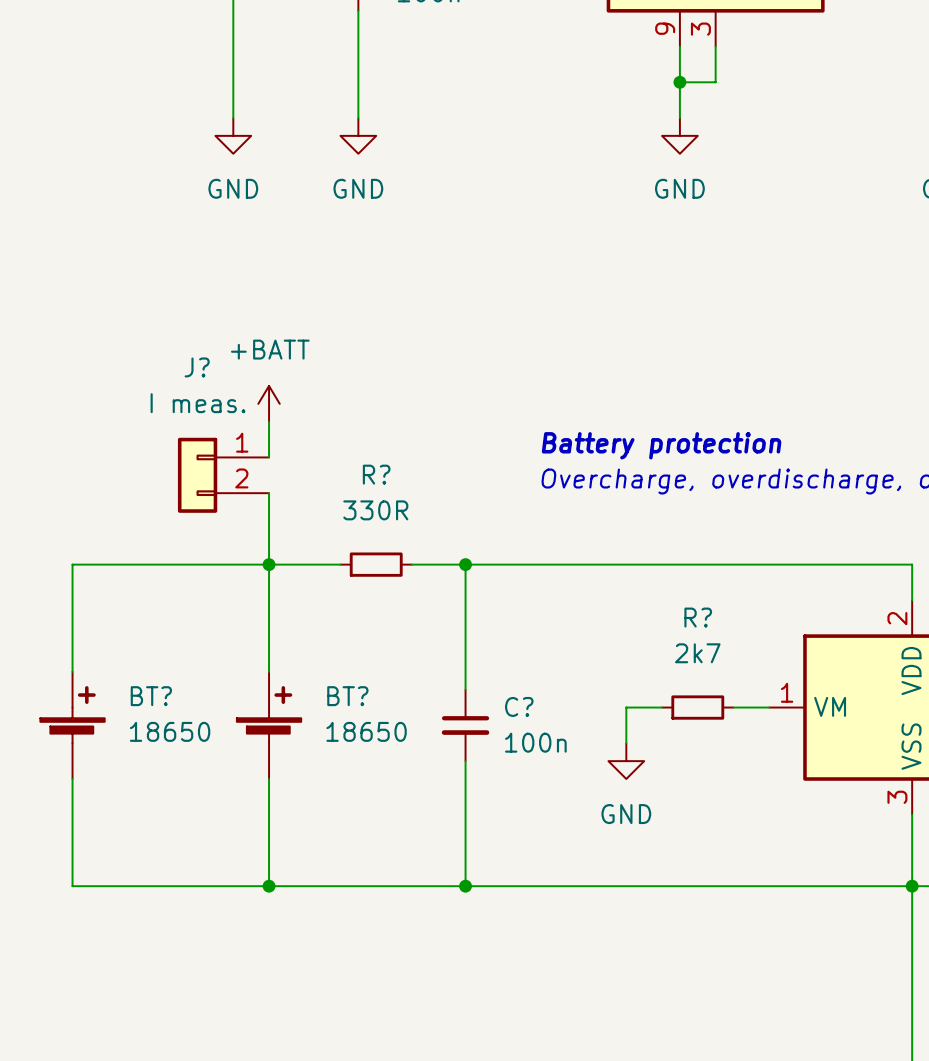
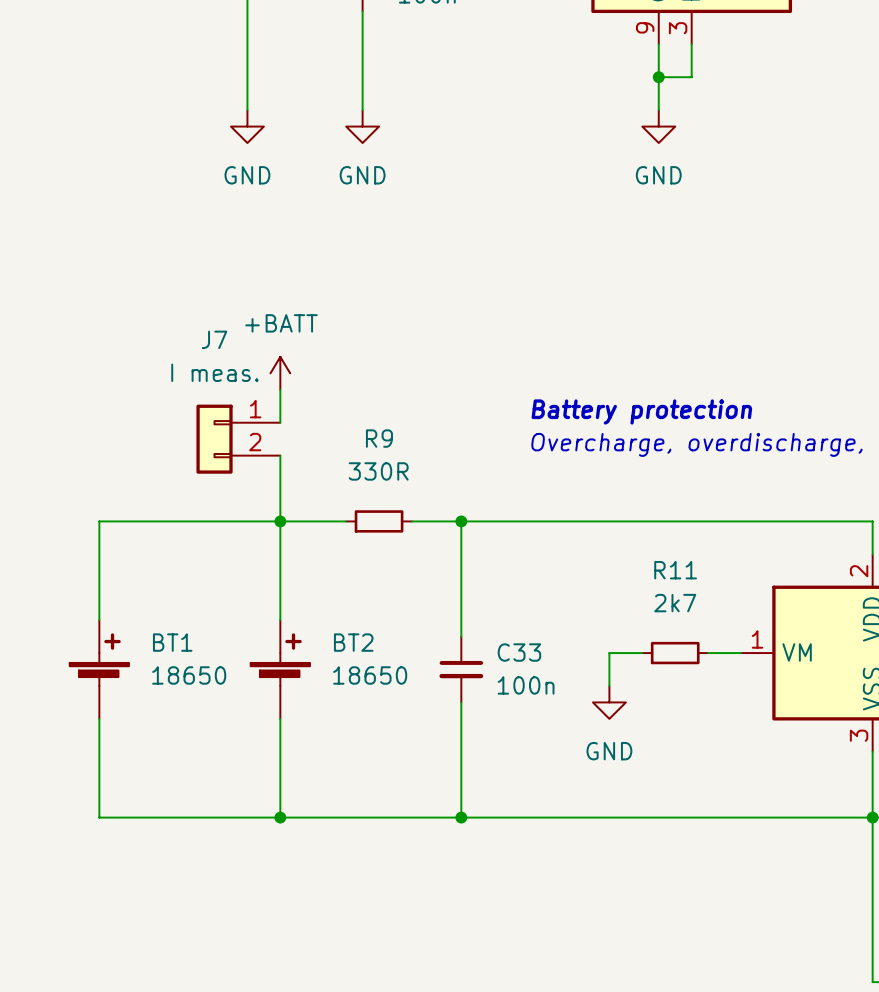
J? name: J? (197, 367) -> J7 (214, 339)
R? name: R? (376, 474) -> R9 (379, 438)
R? name: R? (698, 617) -> R11 (675, 570)
BT? name: BT? (151, 696) -> BT1 (172, 642)
BT? name: BT? (347, 696) -> BT2 (353, 642)
C? name: C? (519, 706) -> C33 (519, 652)

